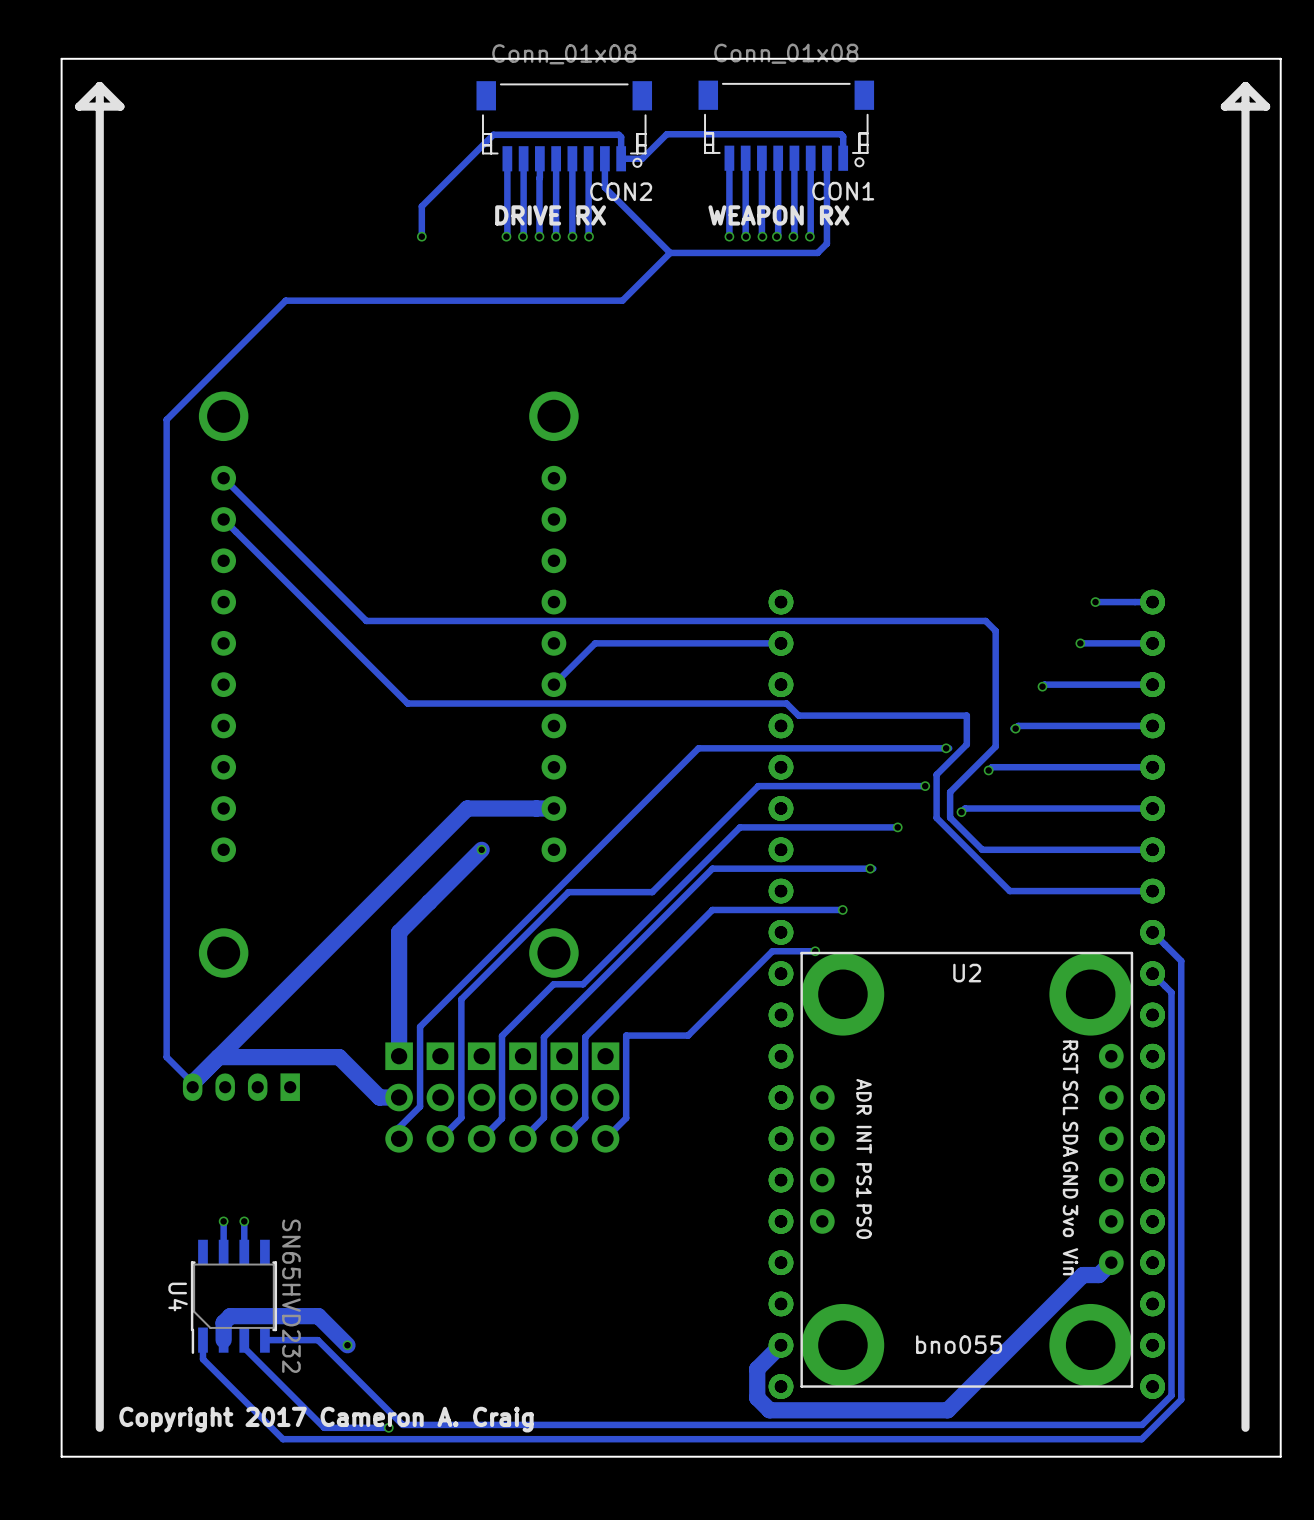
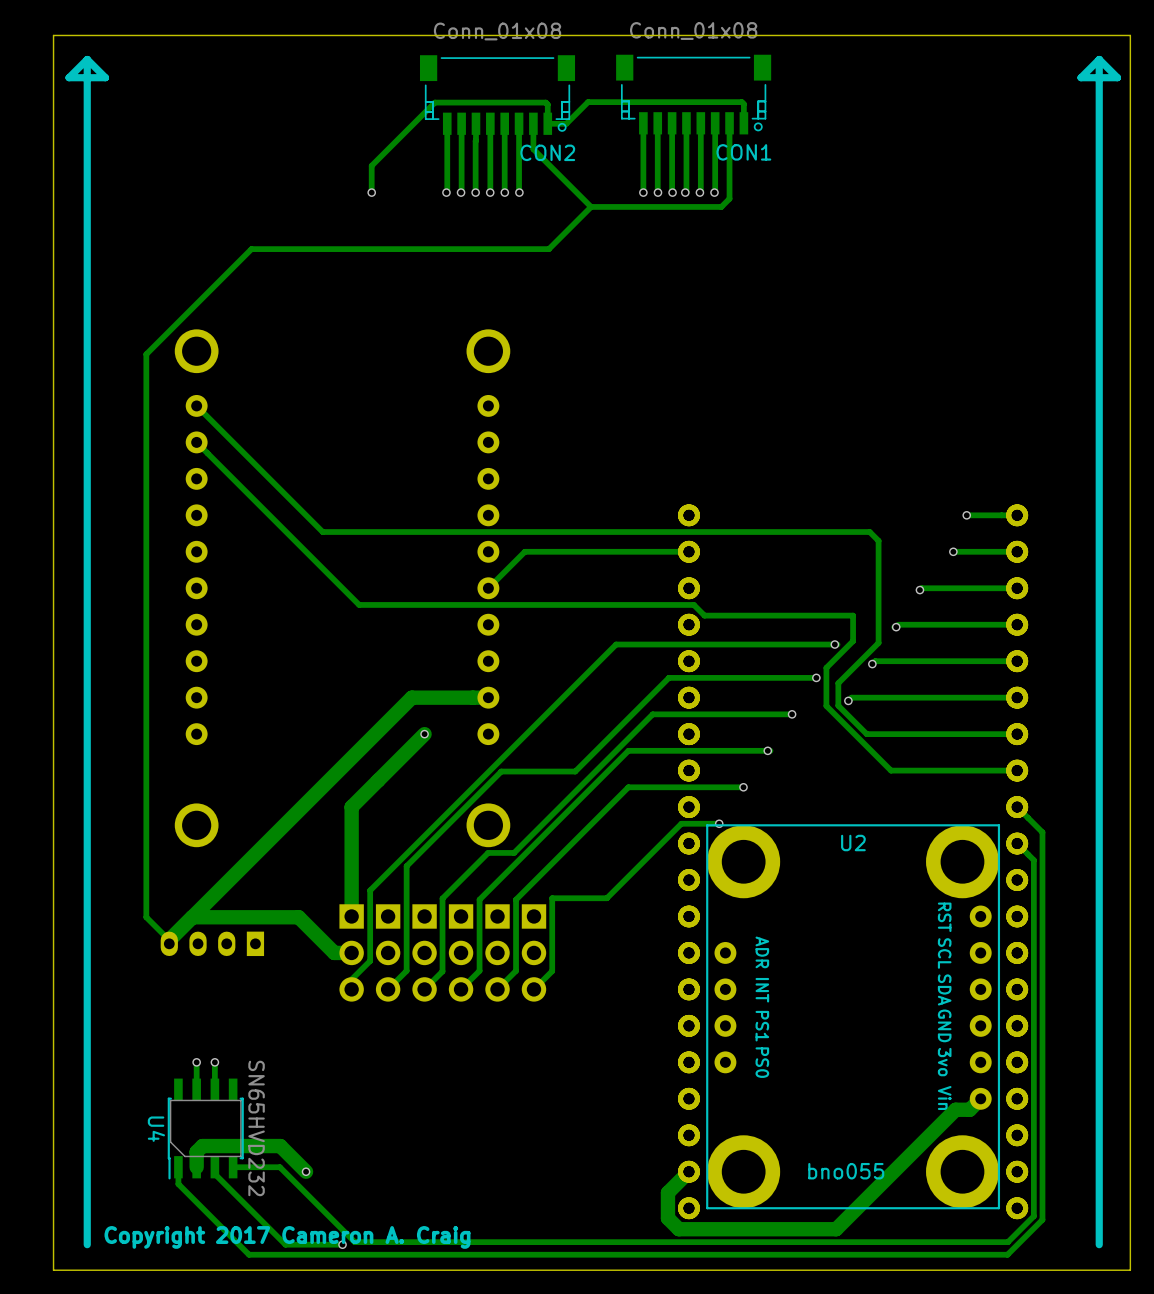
text: DRIVE RX (550, 215) -> none
text: WEAPON RX (778, 215) -> none

